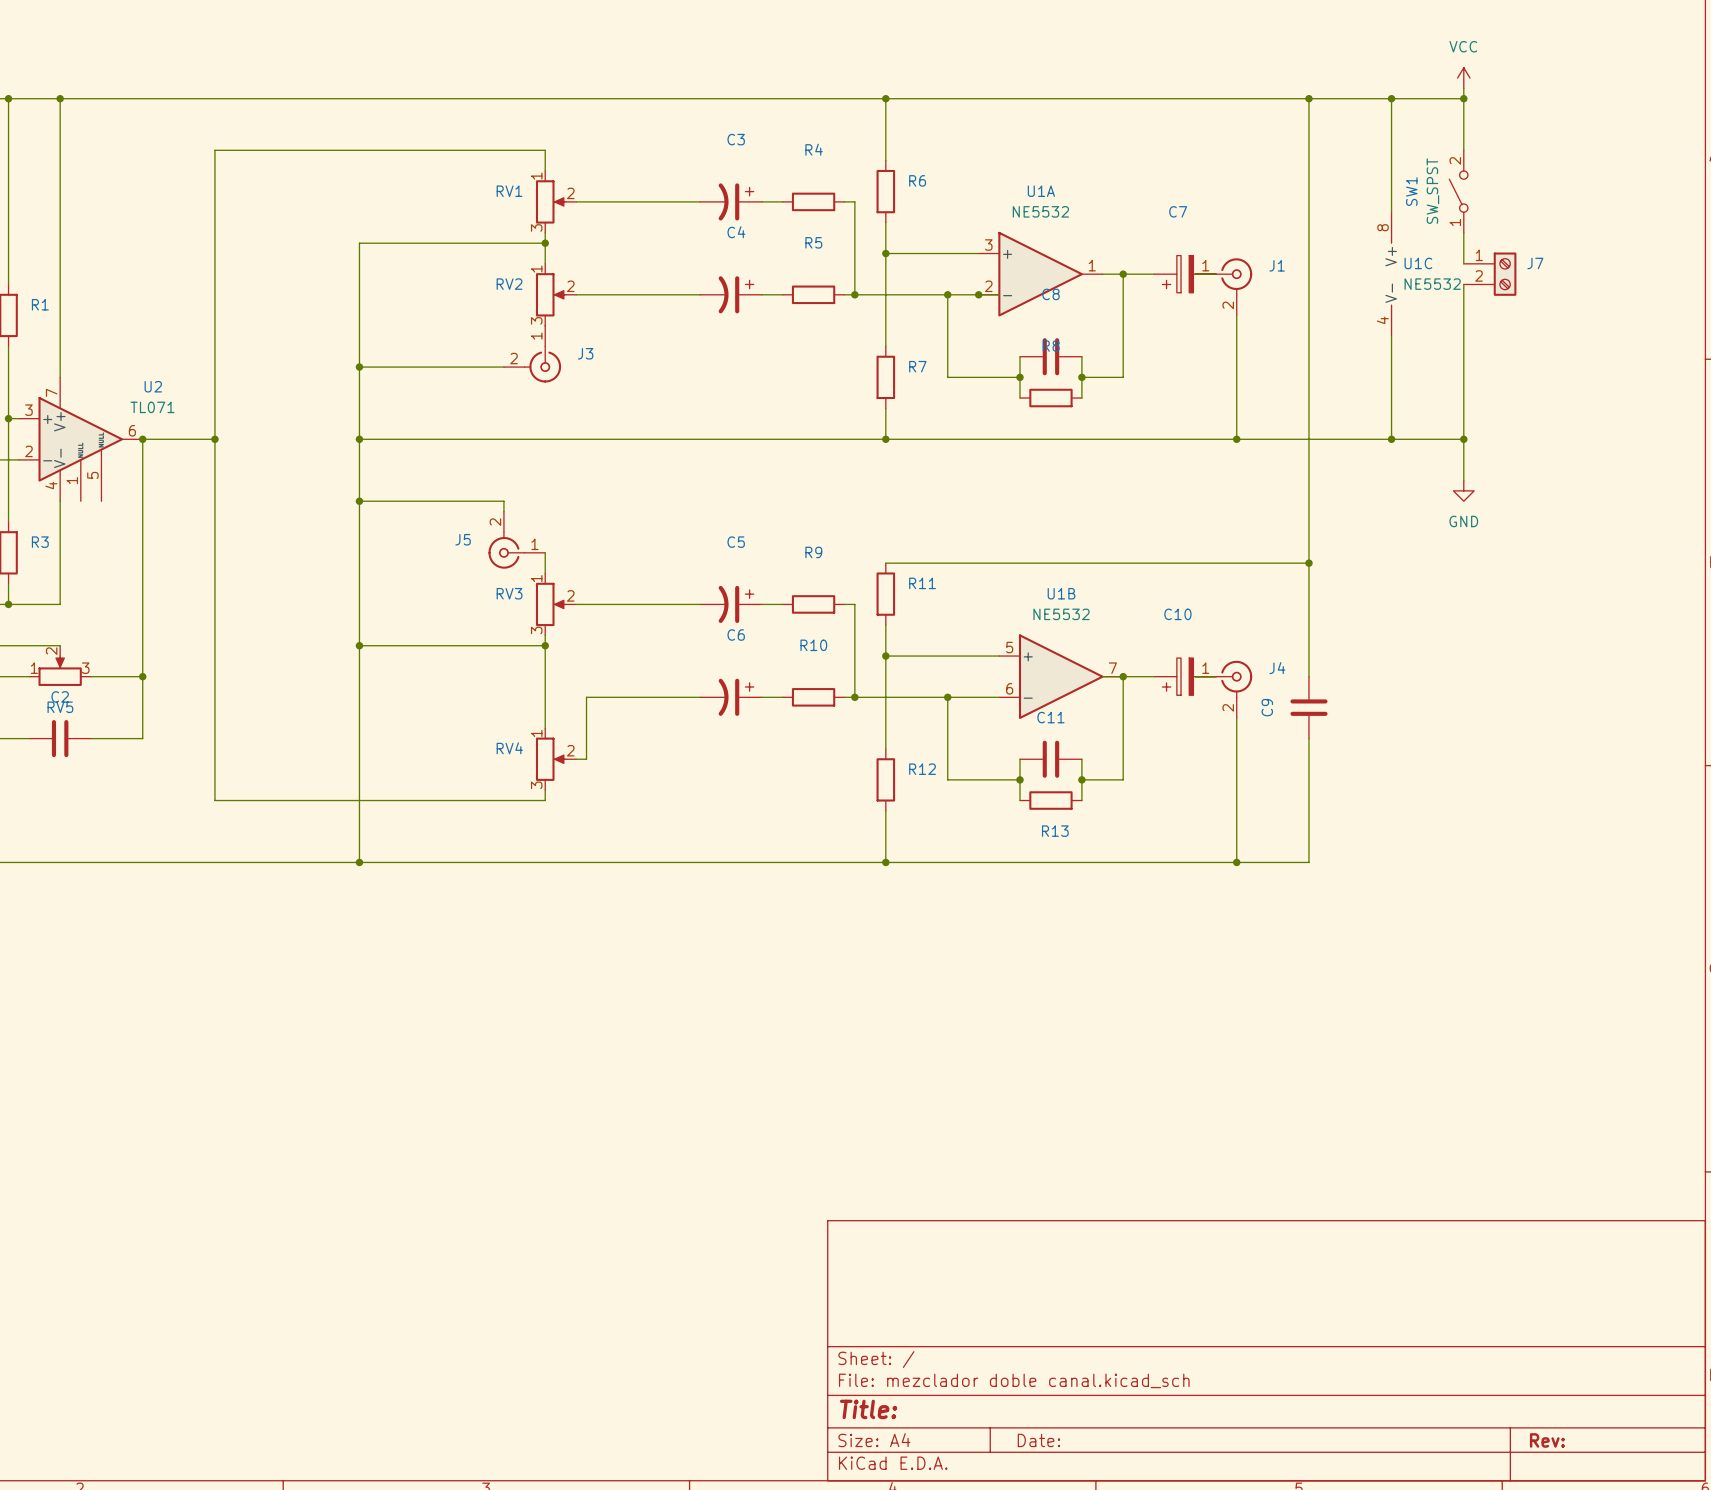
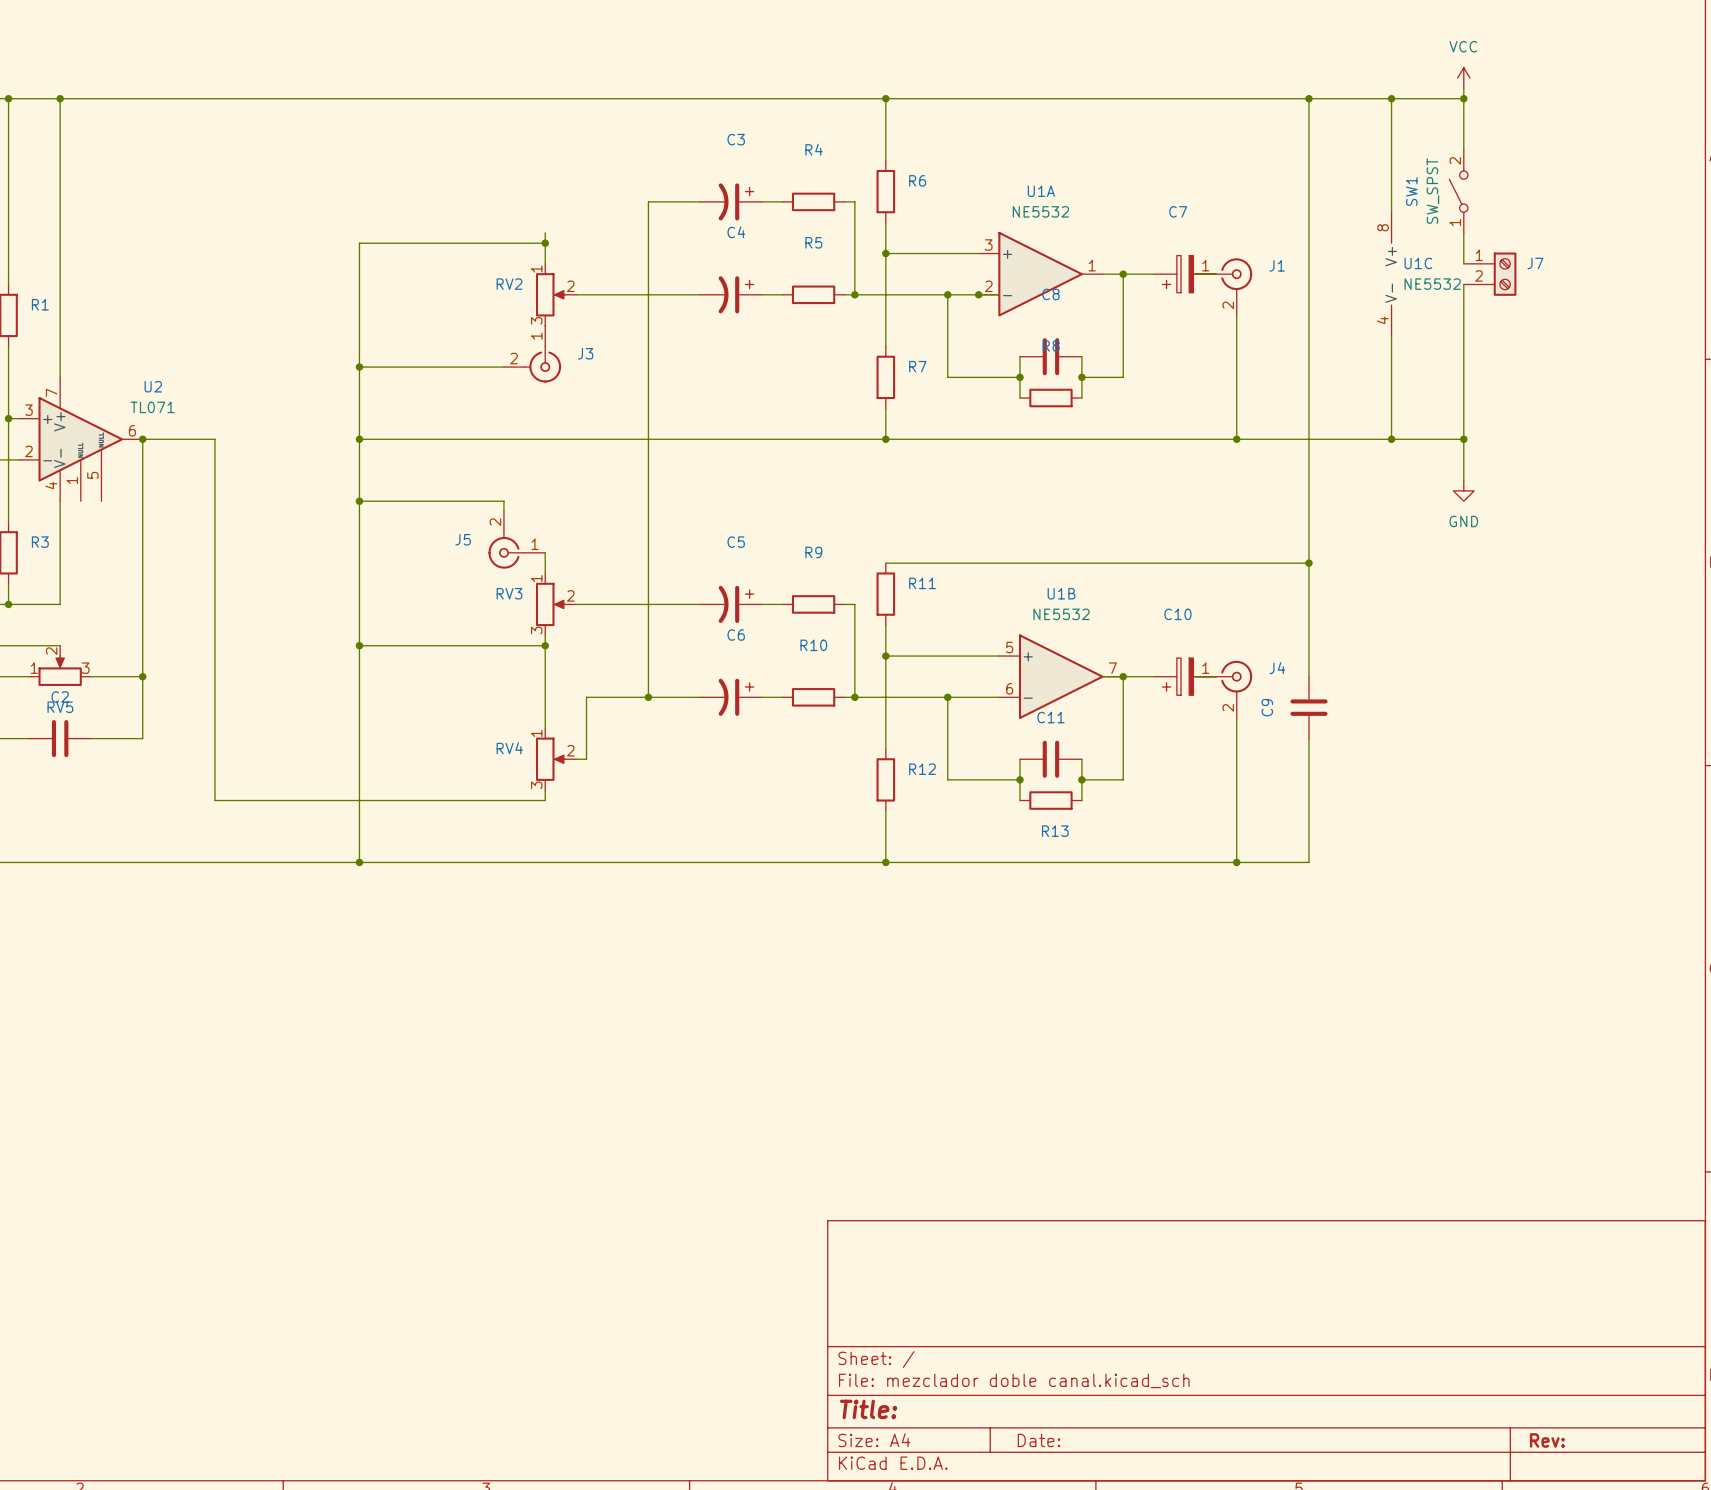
wire: (545, 170) (545, 150) (214, 150) (214, 439) -> none
RV1: (556, 201) -> none
wire: (576, 201) (648, 201) -> (648, 697) (648, 201)
junction: (214, 439) -> none
junction: none -> (648, 697)

